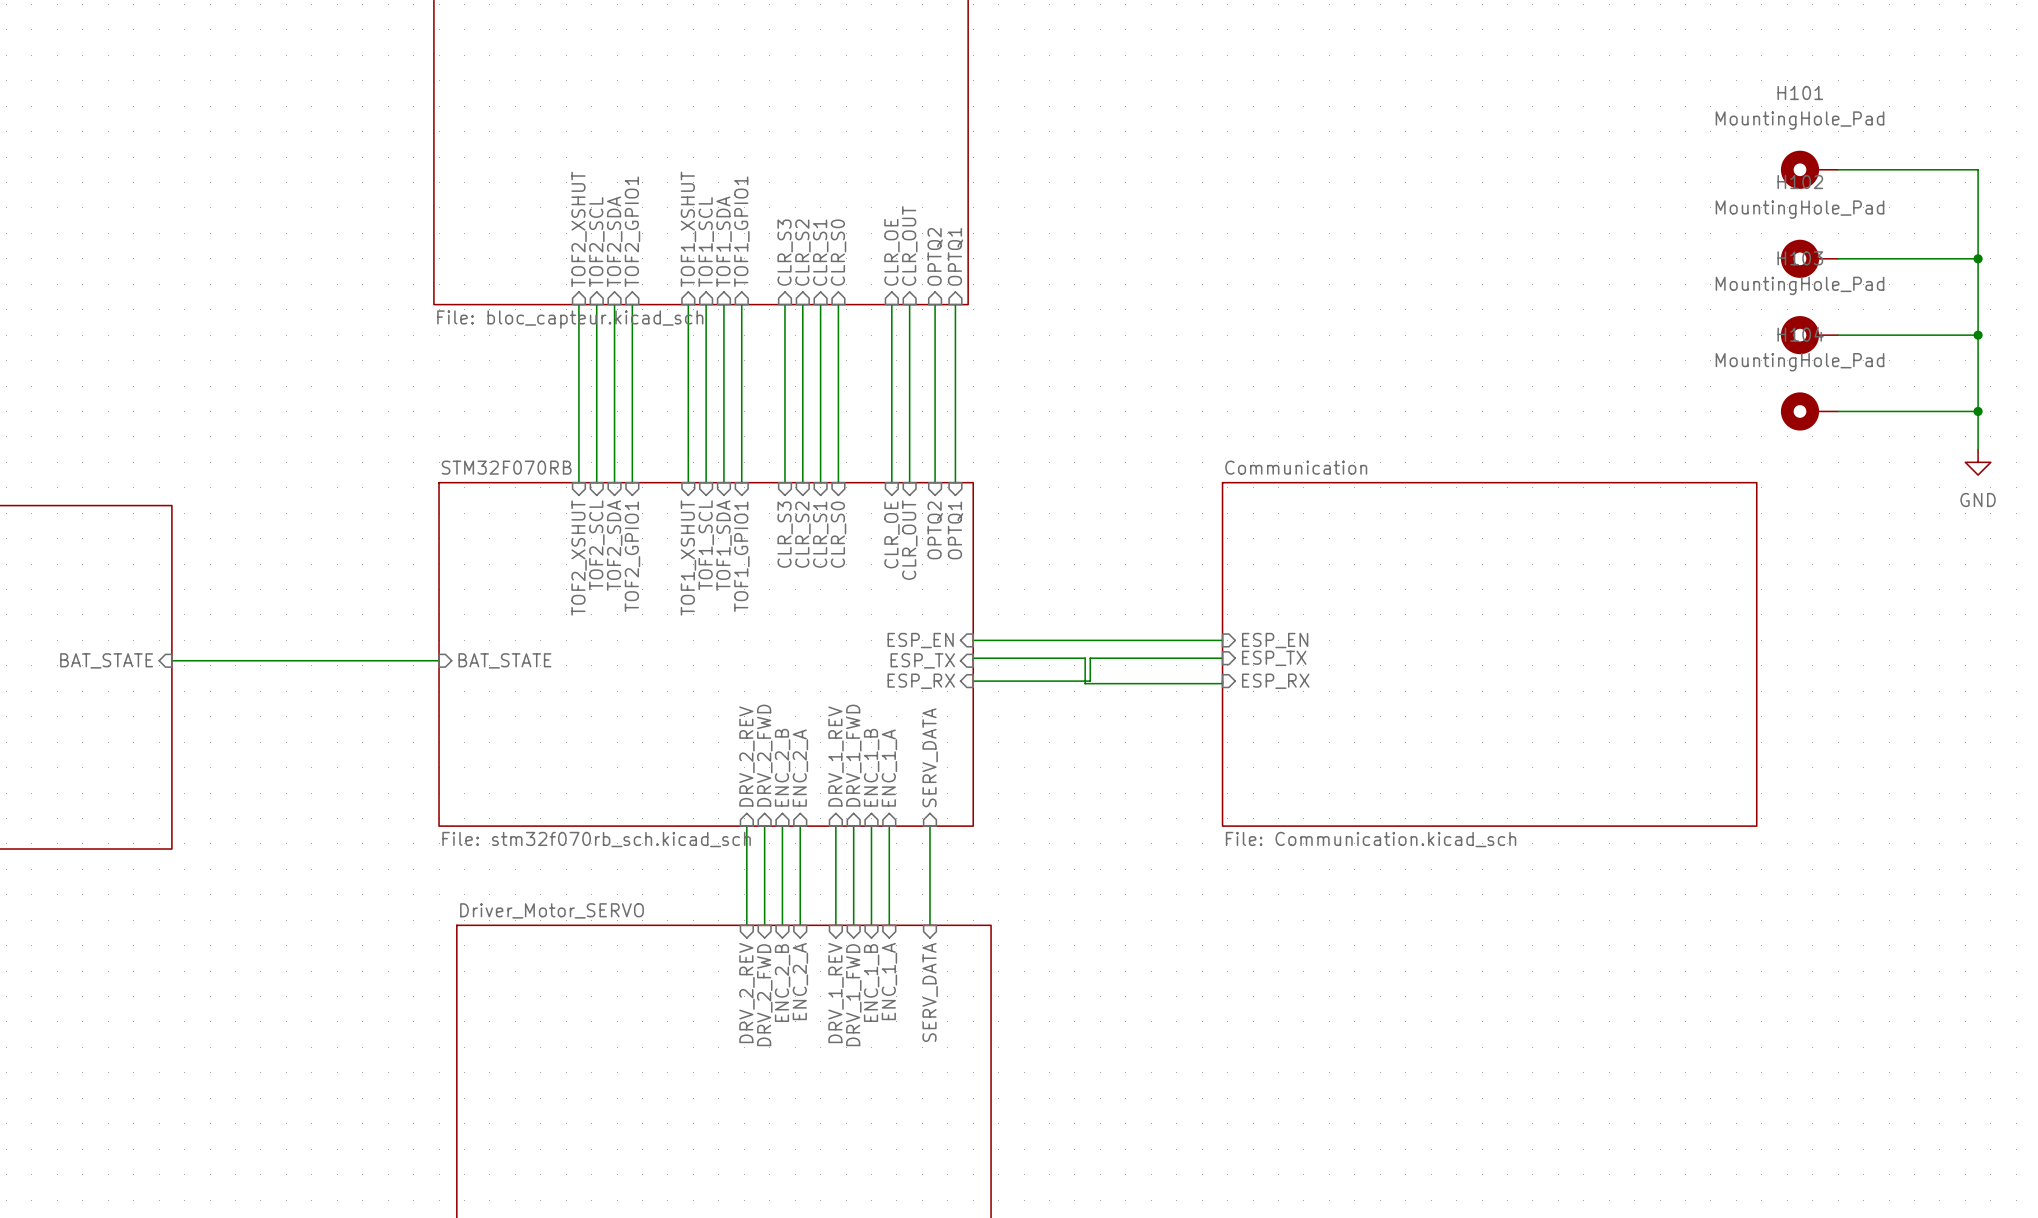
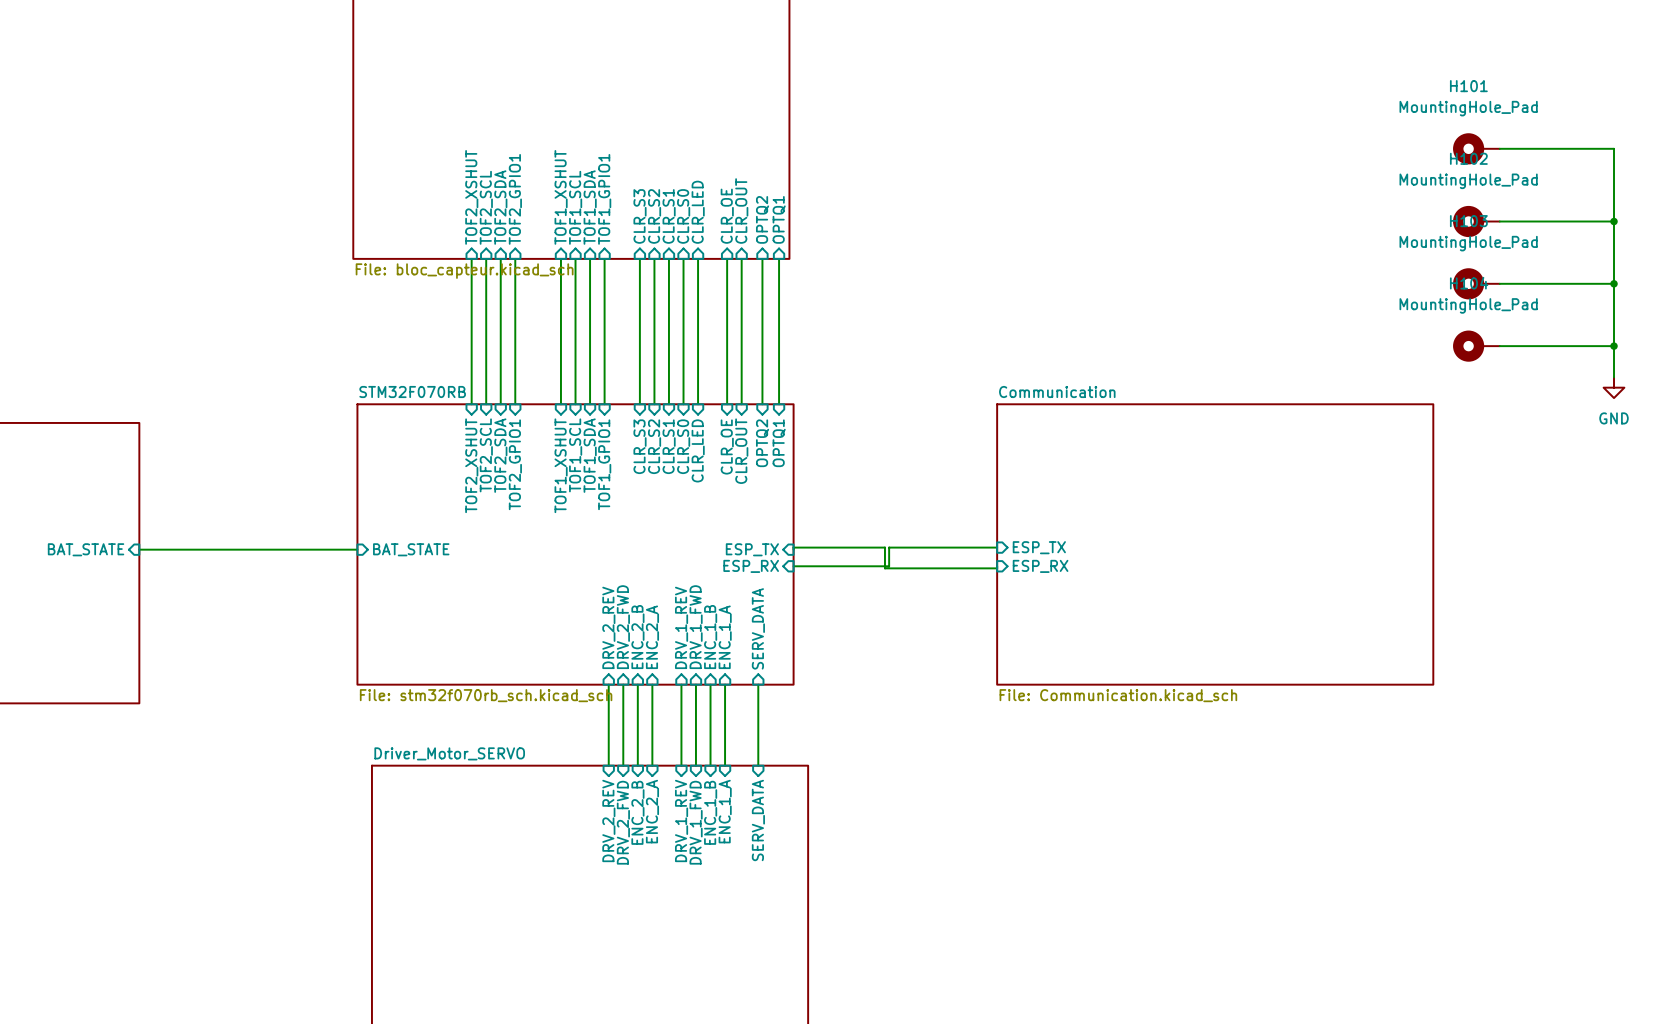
sheet pin: none -> CLR_LED (698, 212)
wire: none -> (698, 258) (698, 404)
sheet pin: none -> CLR_LED (698, 450)
sheet pin: ESP_EN (920, 640) -> none
wire: (973, 640) (1222, 640) -> none
sheet pin: ESP_EN (1275, 640) -> none

